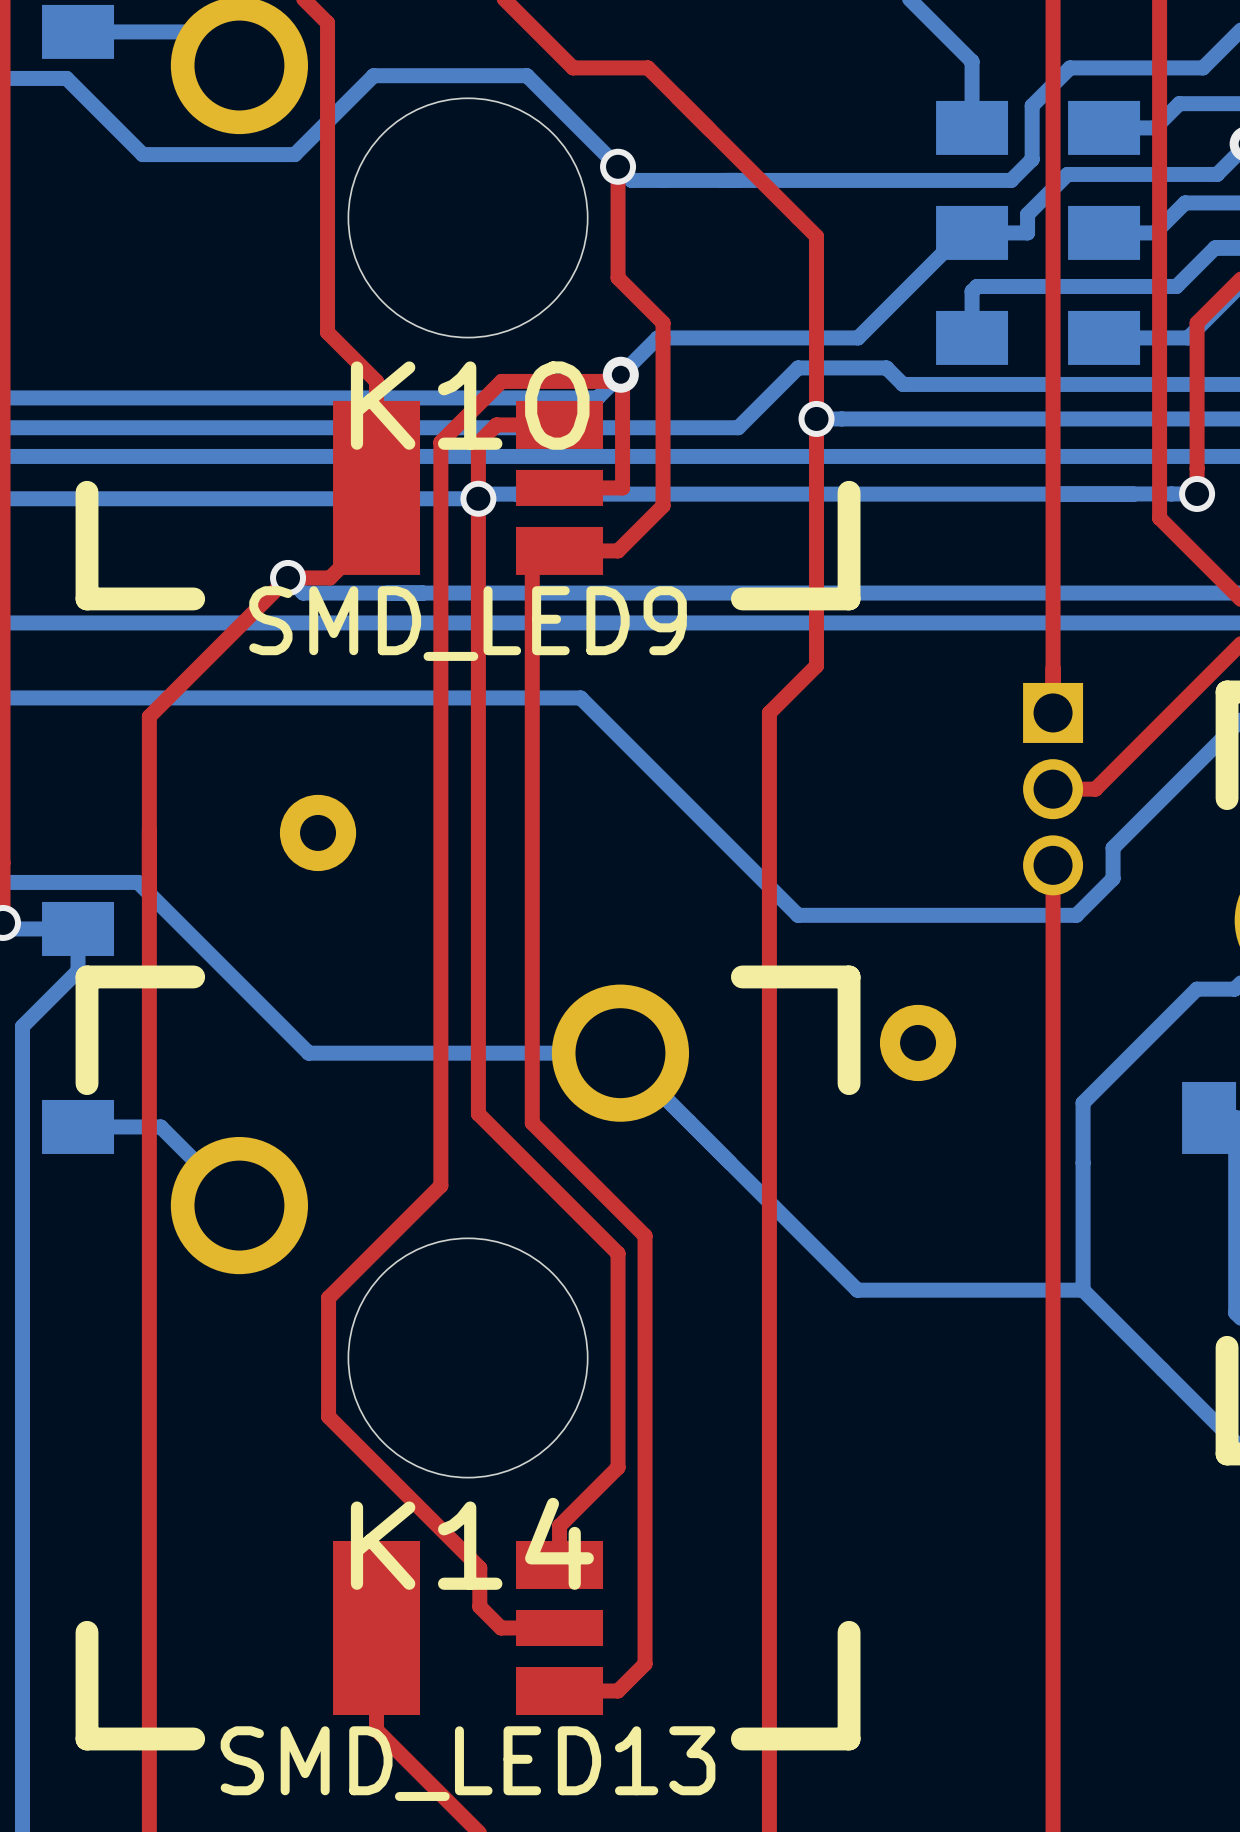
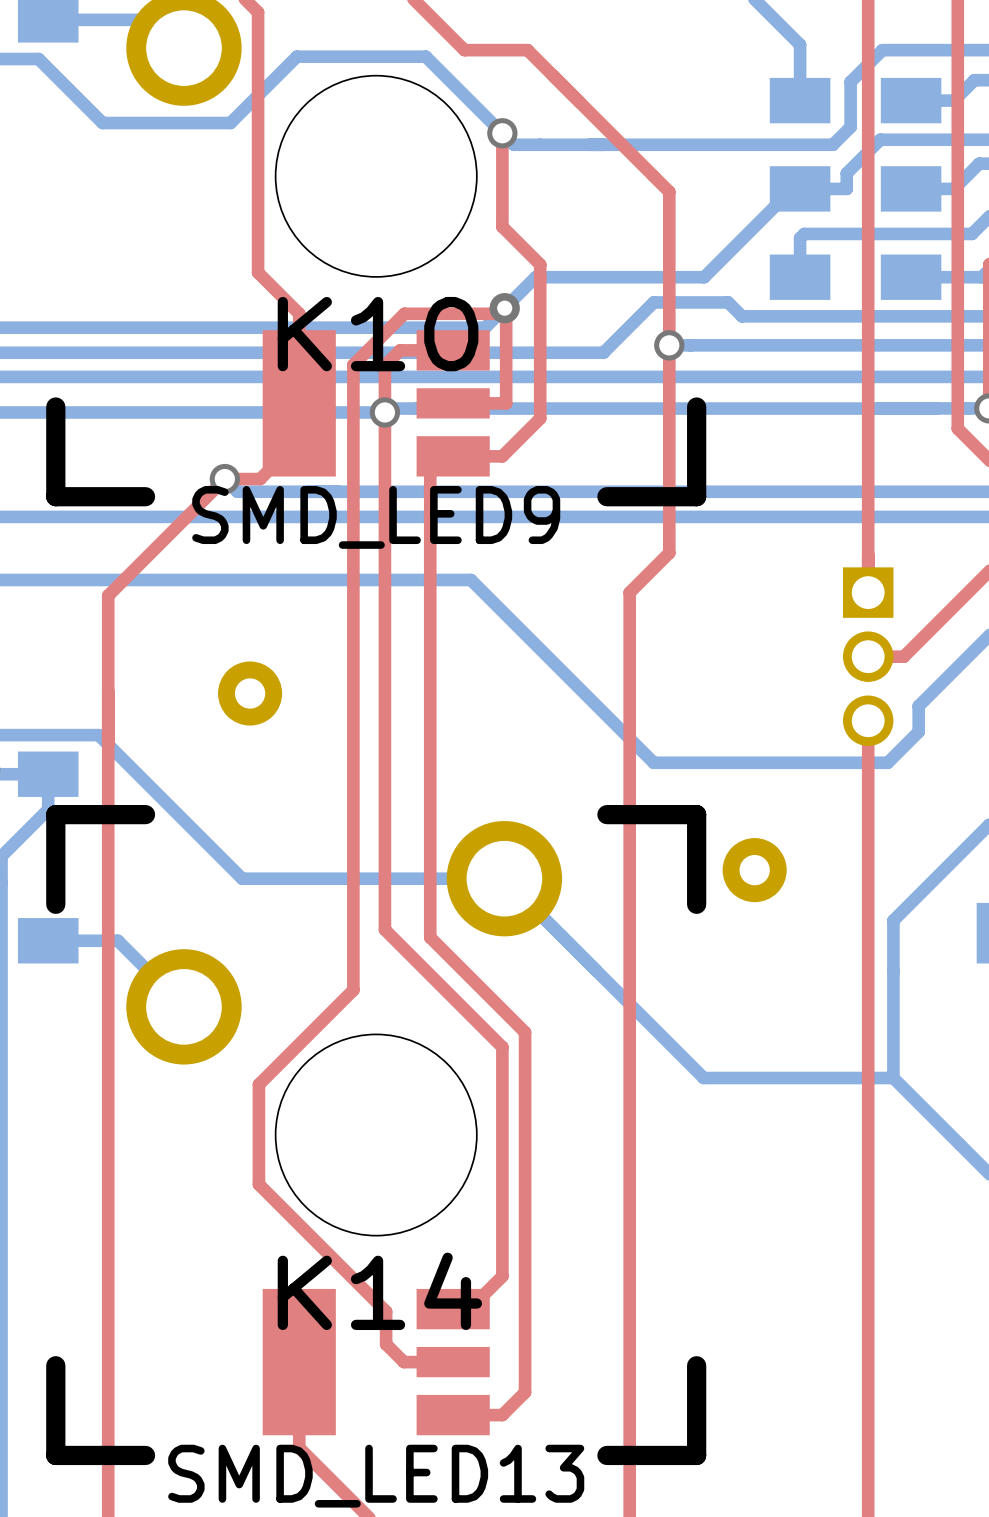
top track: (618, 1467) (559, 1525) (559, 1564) -> (502, 1227) (502, 1276) (469, 1309) (453, 1309)

